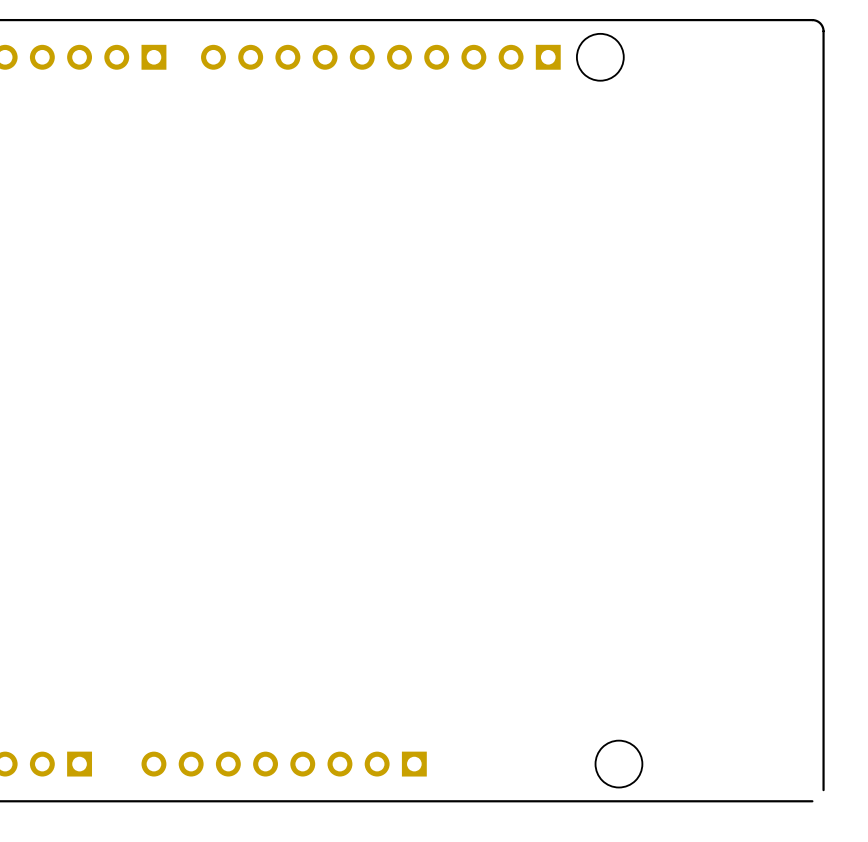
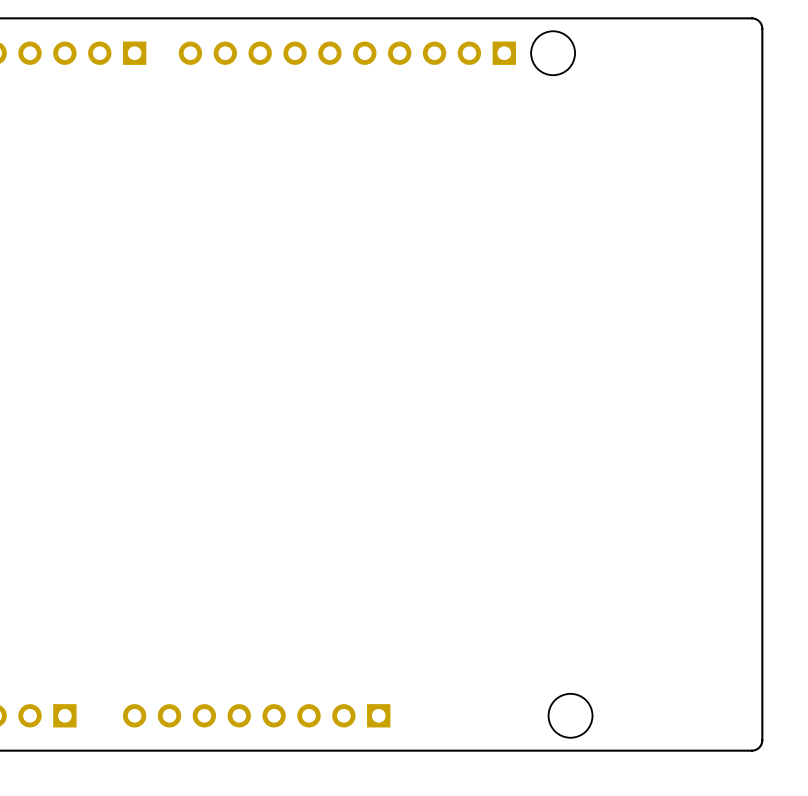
board edge: none -> (762, 740) (759, 747) (751, 750)

